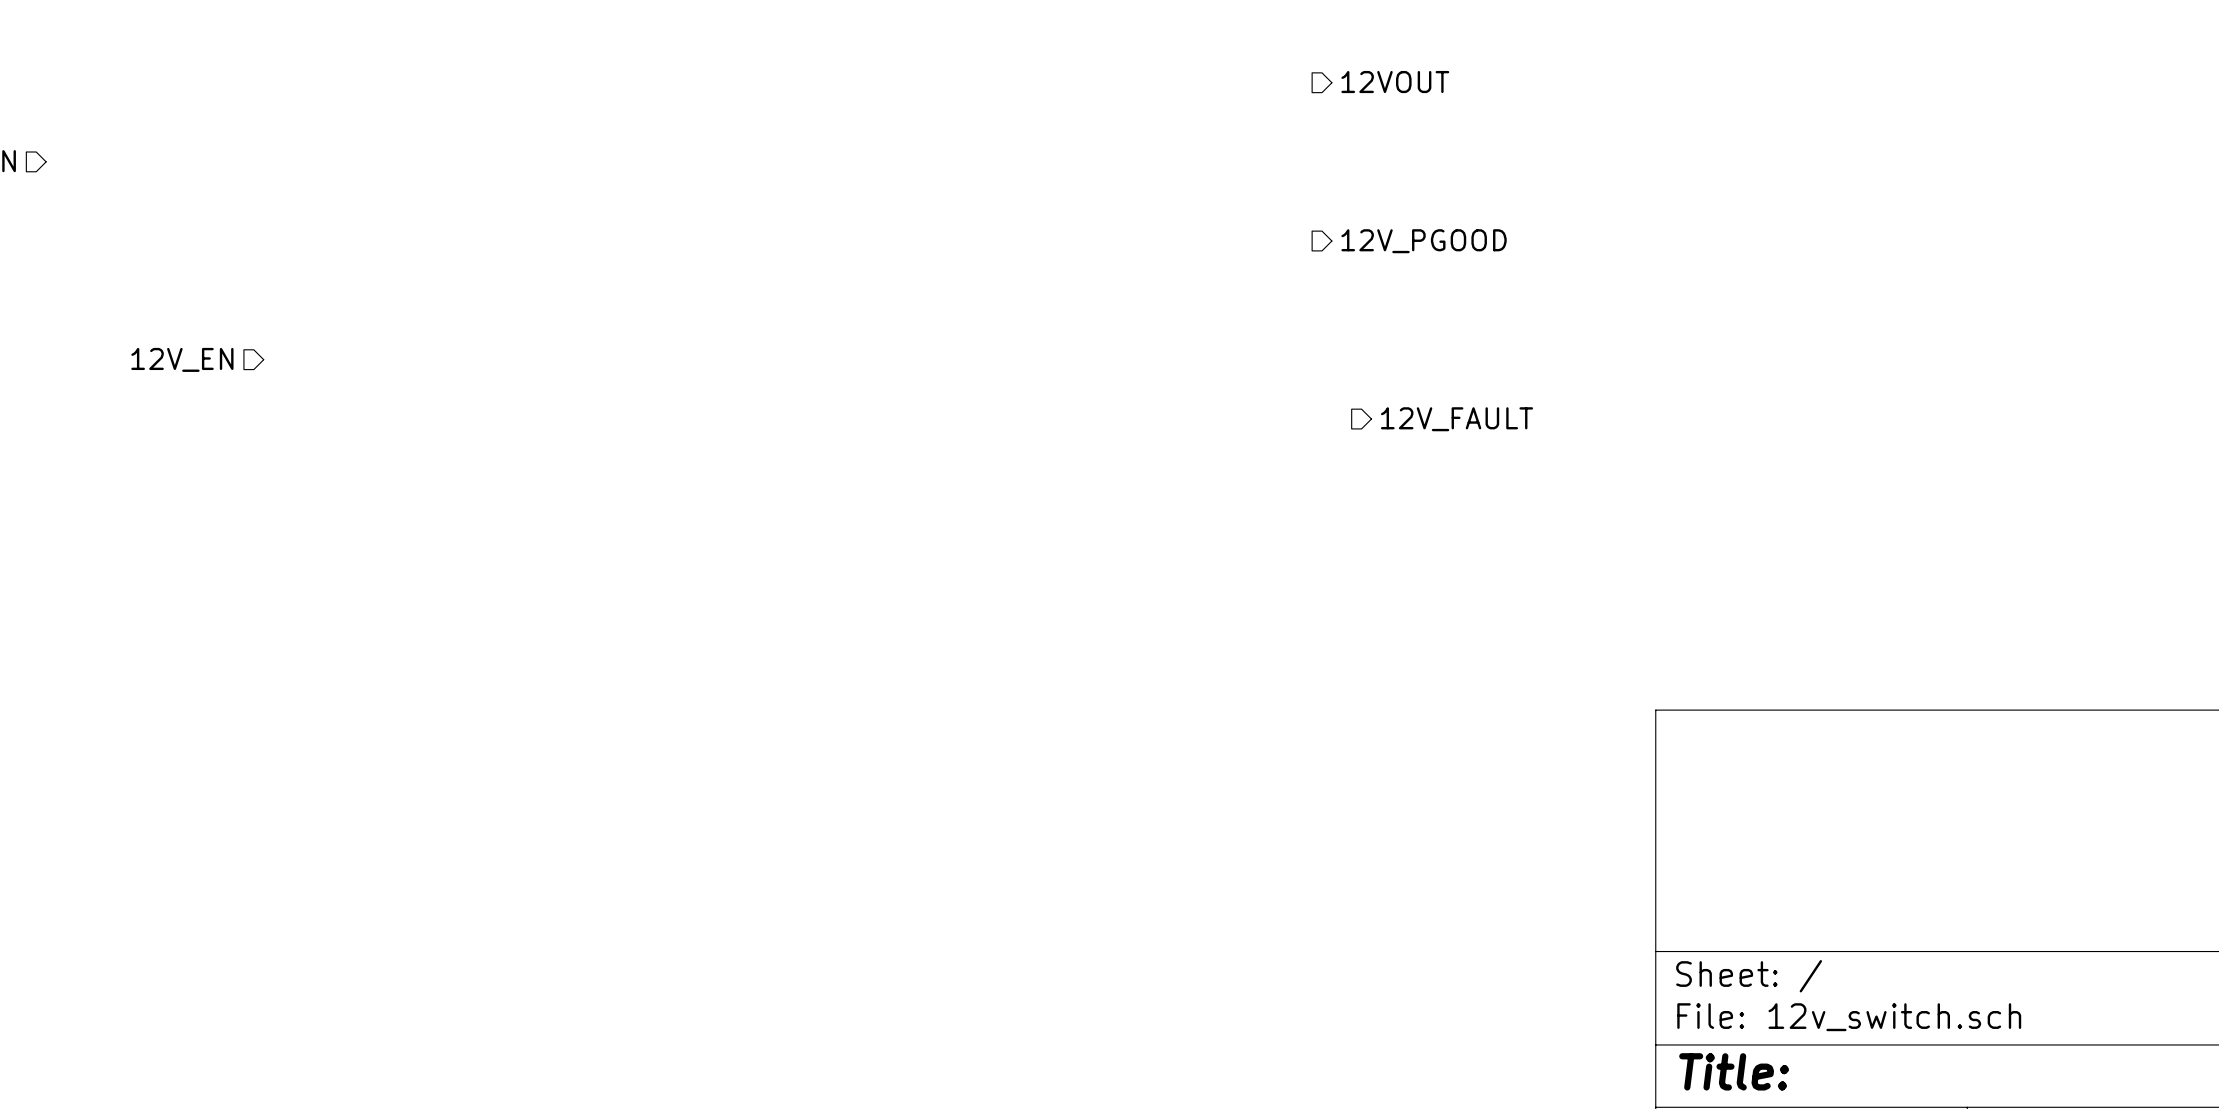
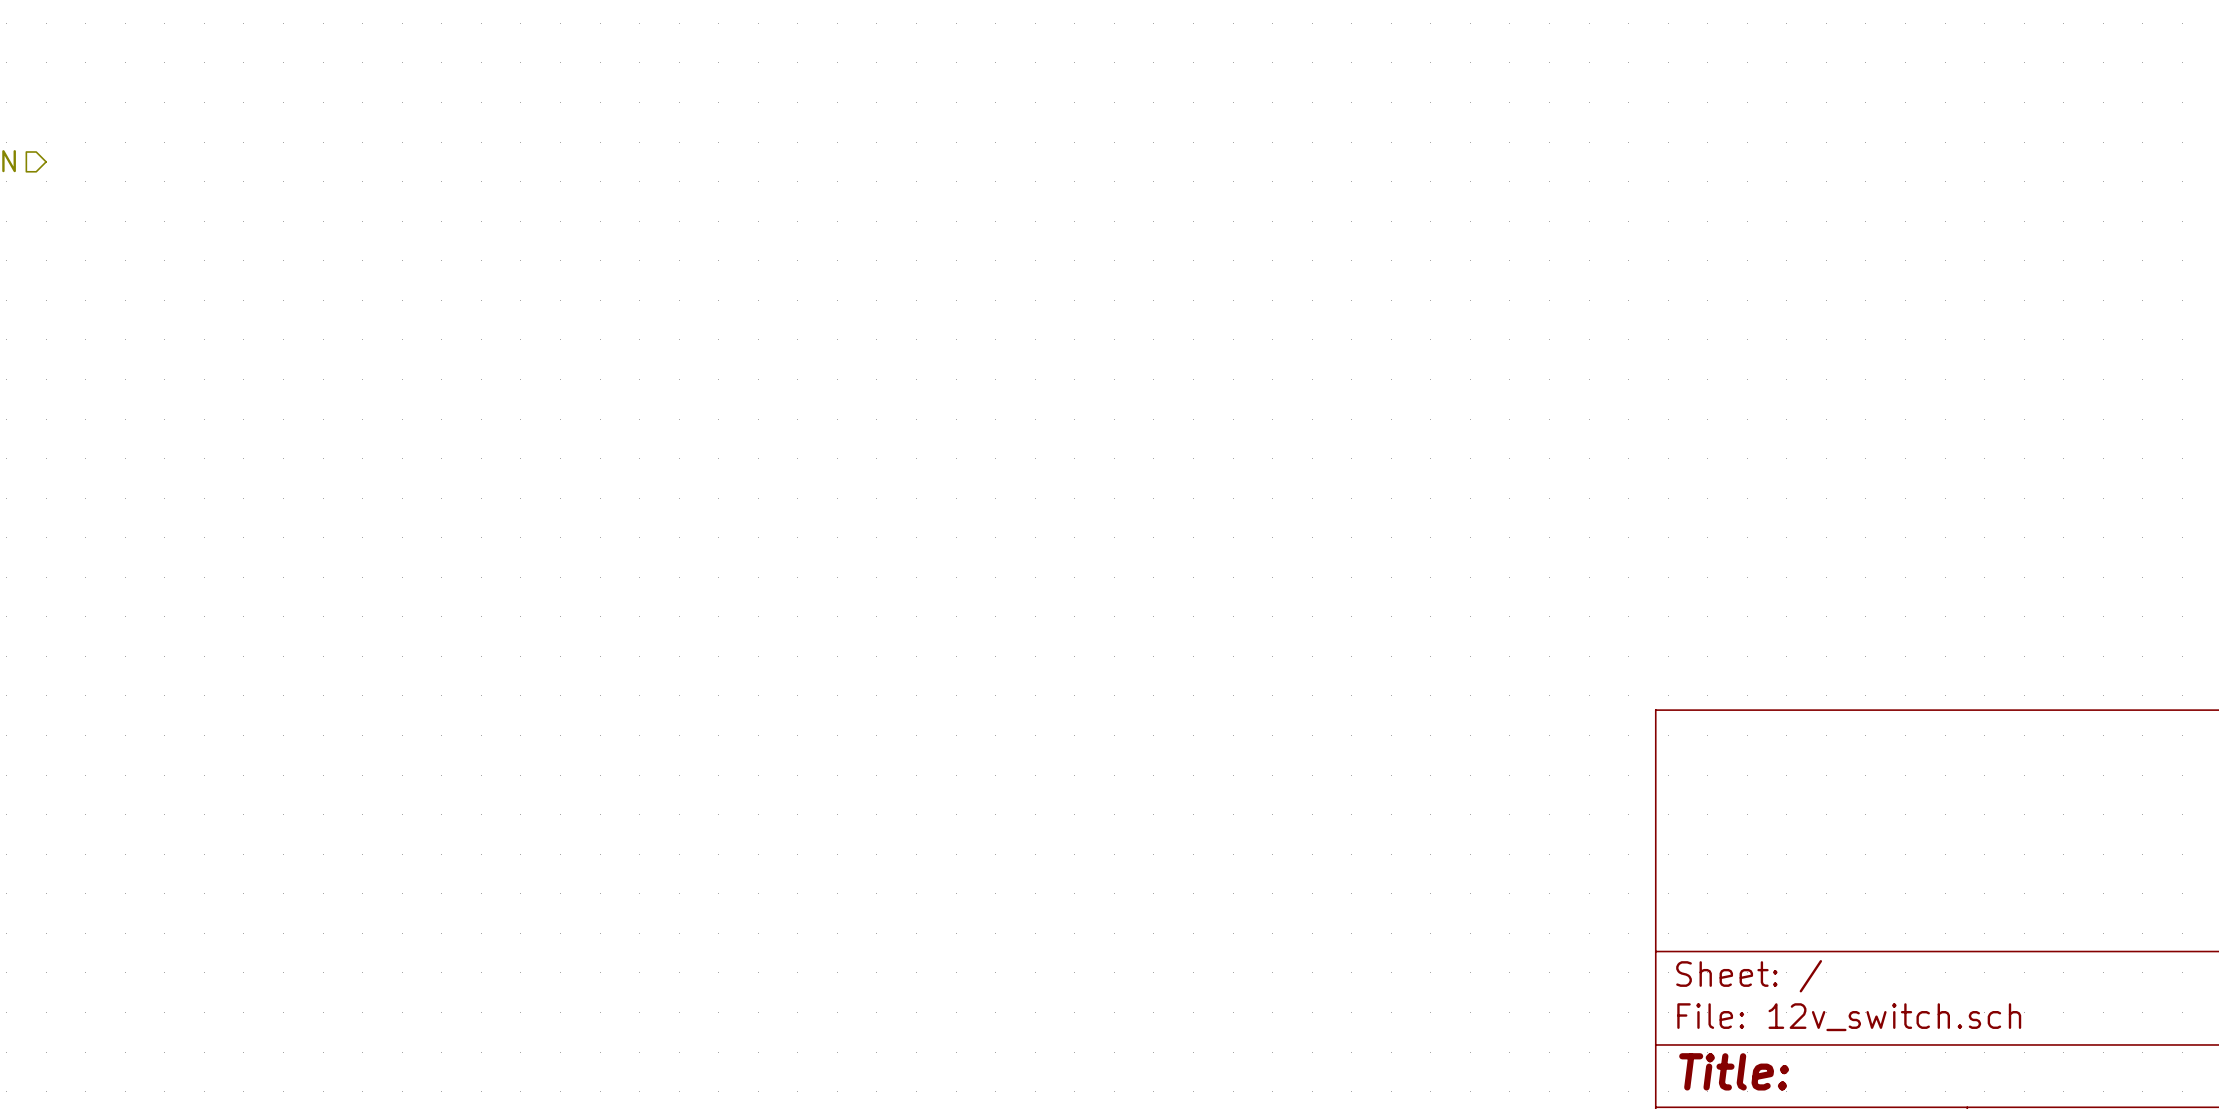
hierarchical label: 12VOUT (1395, 82) -> none
hierarchical label: 12V_PGOOD (1424, 241) -> none
hierarchical label: 12V_EN (182, 359) -> none
hierarchical label: 12V_FAULT (1457, 419) -> none

